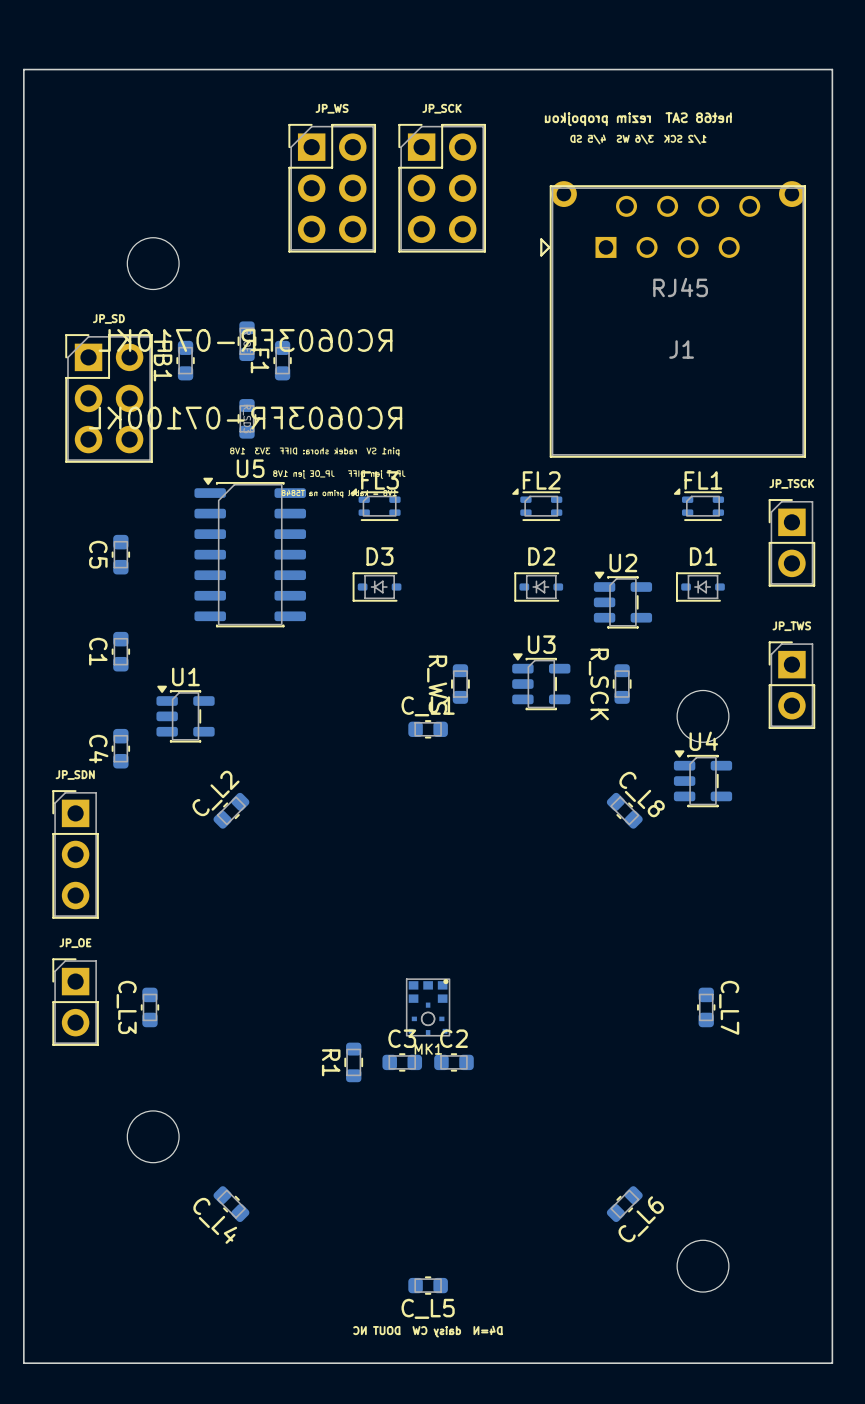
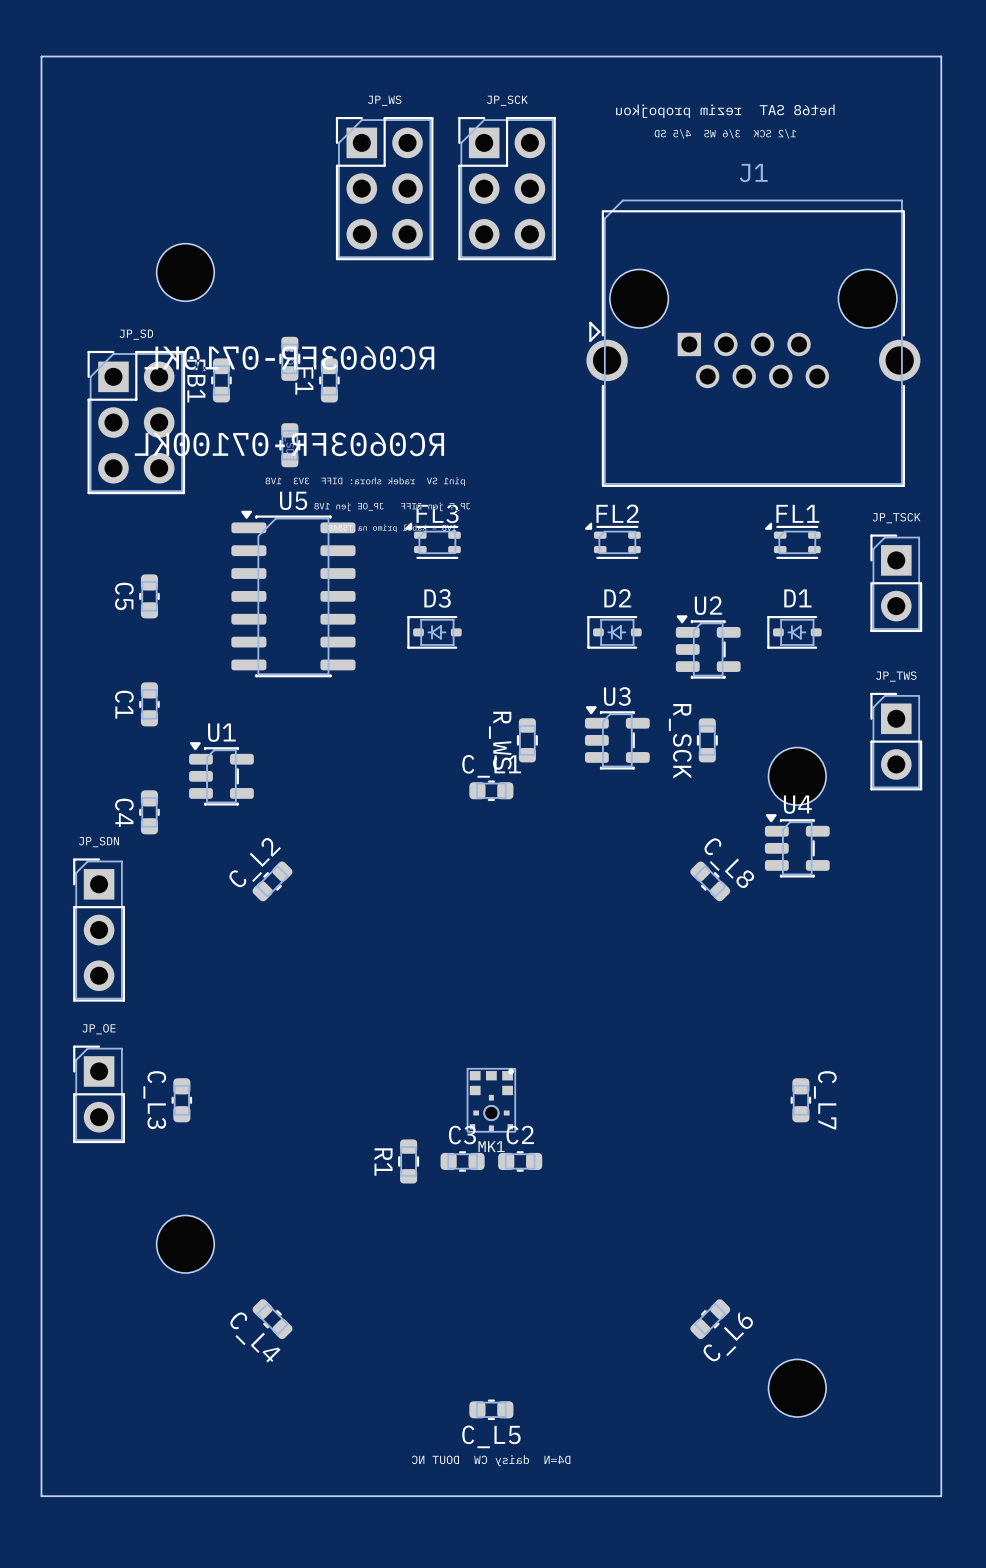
J1 footprint: [540, 181, 807, 458] -> [586, 199, 921, 487]
J1 value: RJ45 (680, 287) -> none
J1 name position: J1 (681, 349) -> J1 (753, 172)

